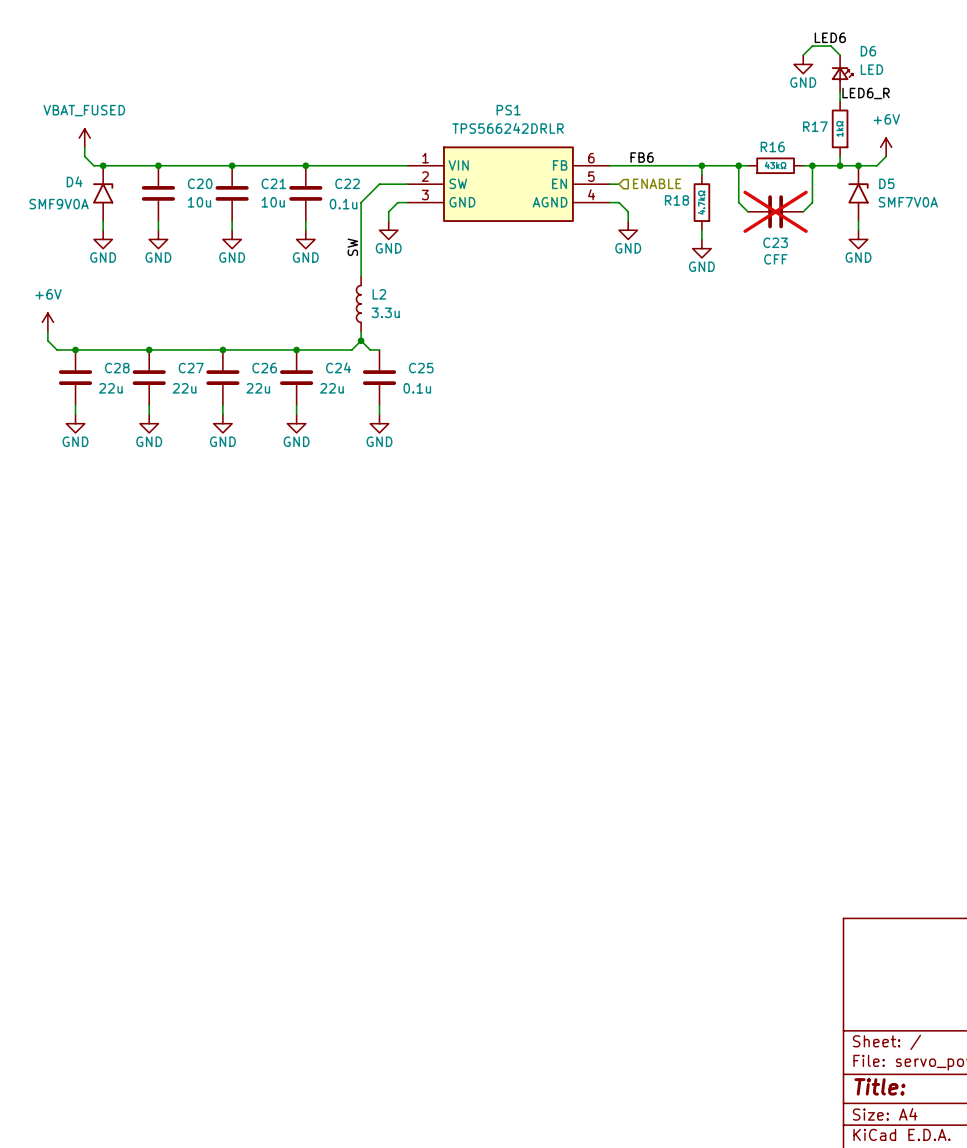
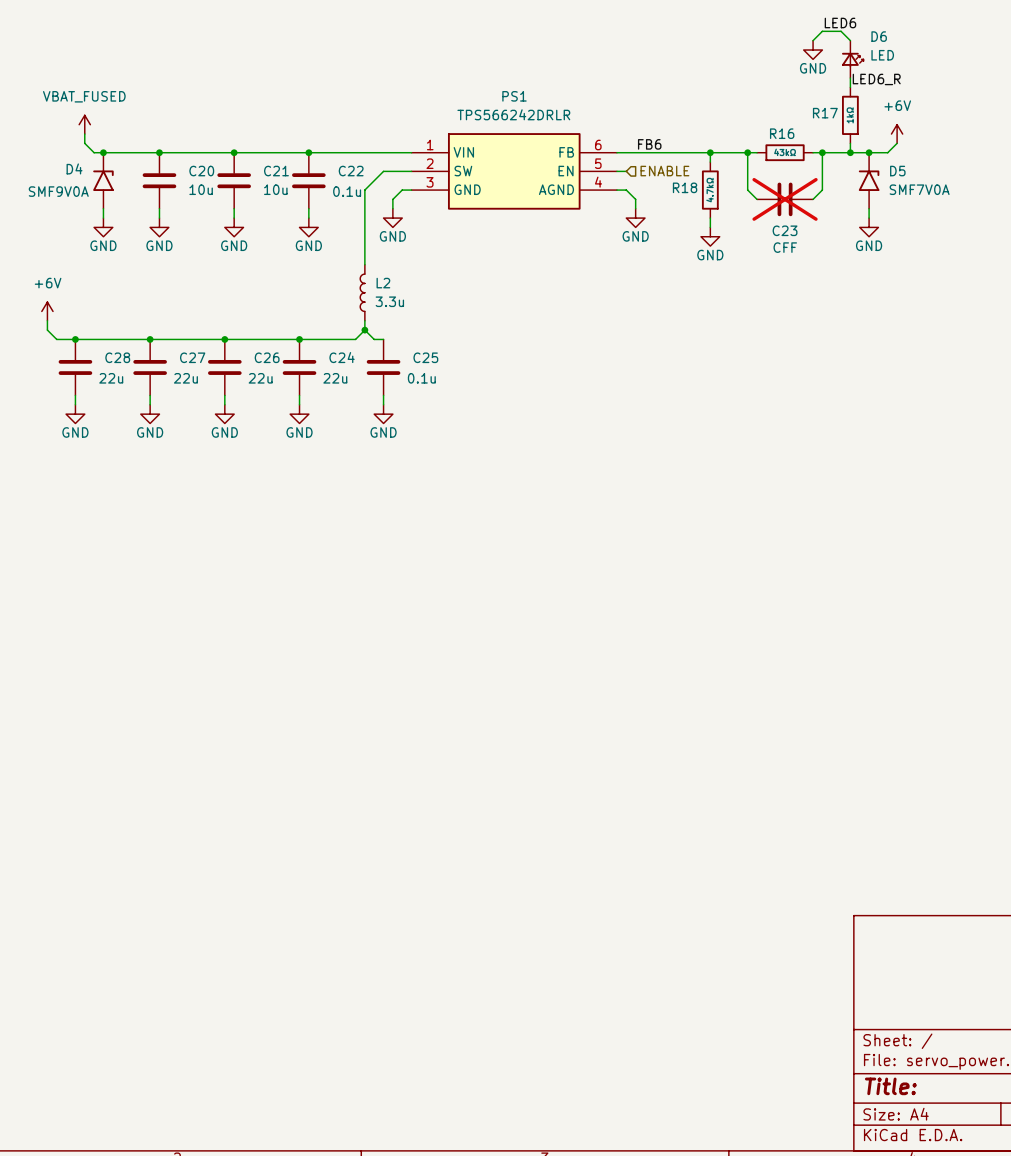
label: SW (352, 247) -> none

